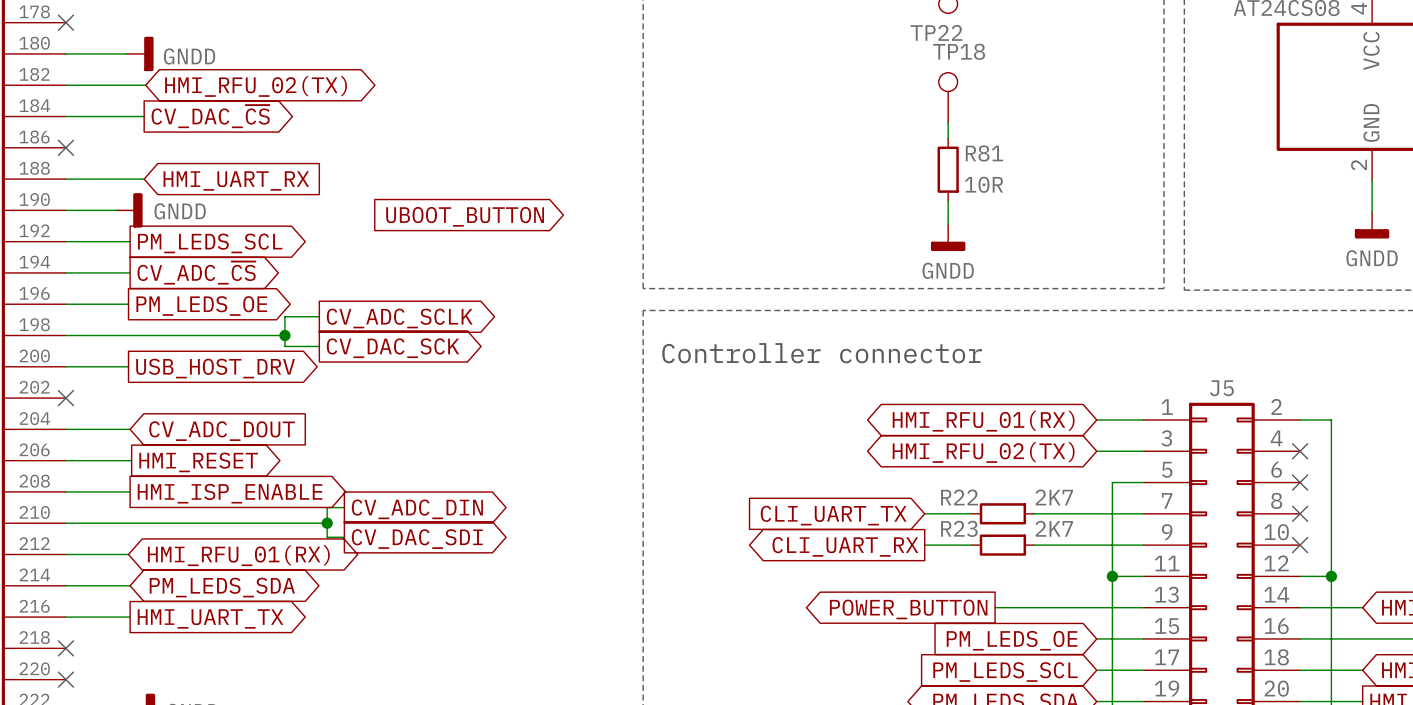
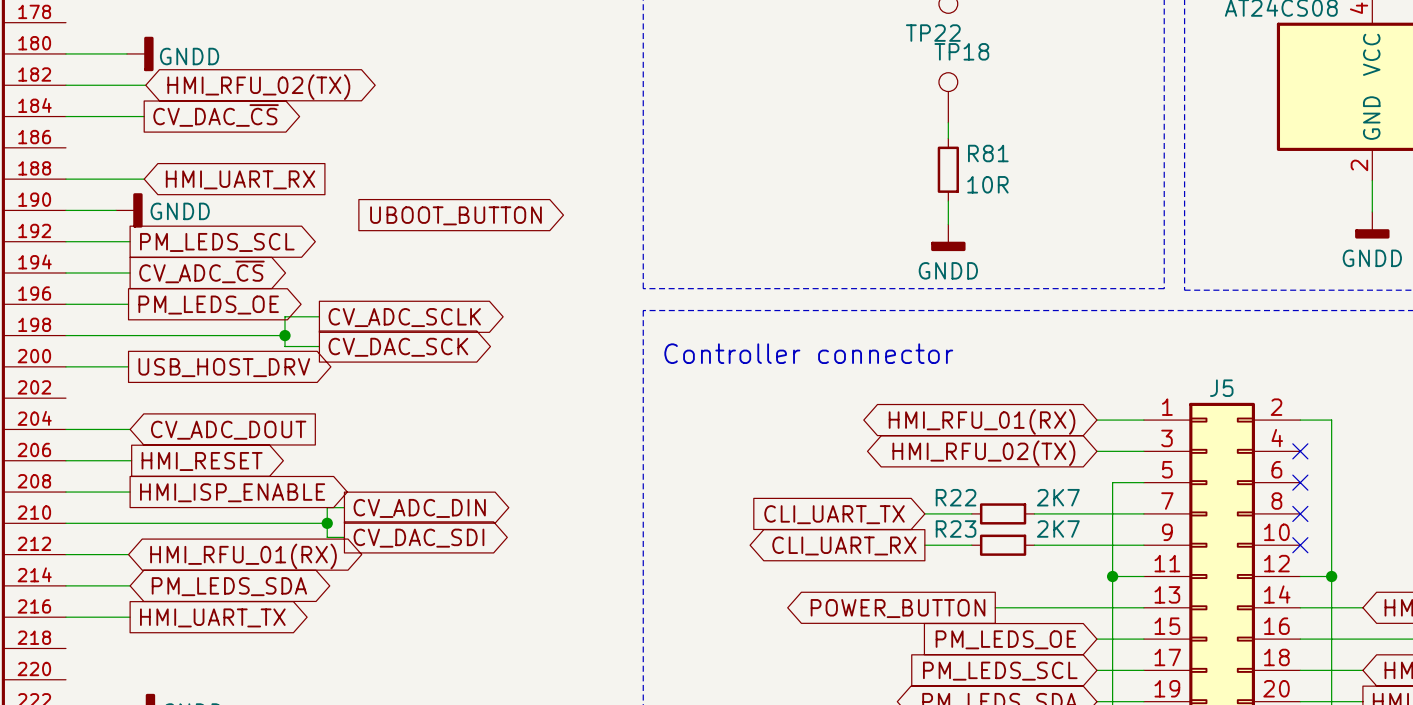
no-connect mark: (65, 22) -> none
no-connect mark: (65, 147) -> none
no-connect mark: (65, 398) -> none
no-connect mark: (65, 648) -> none
no-connect mark: (65, 679) -> none

